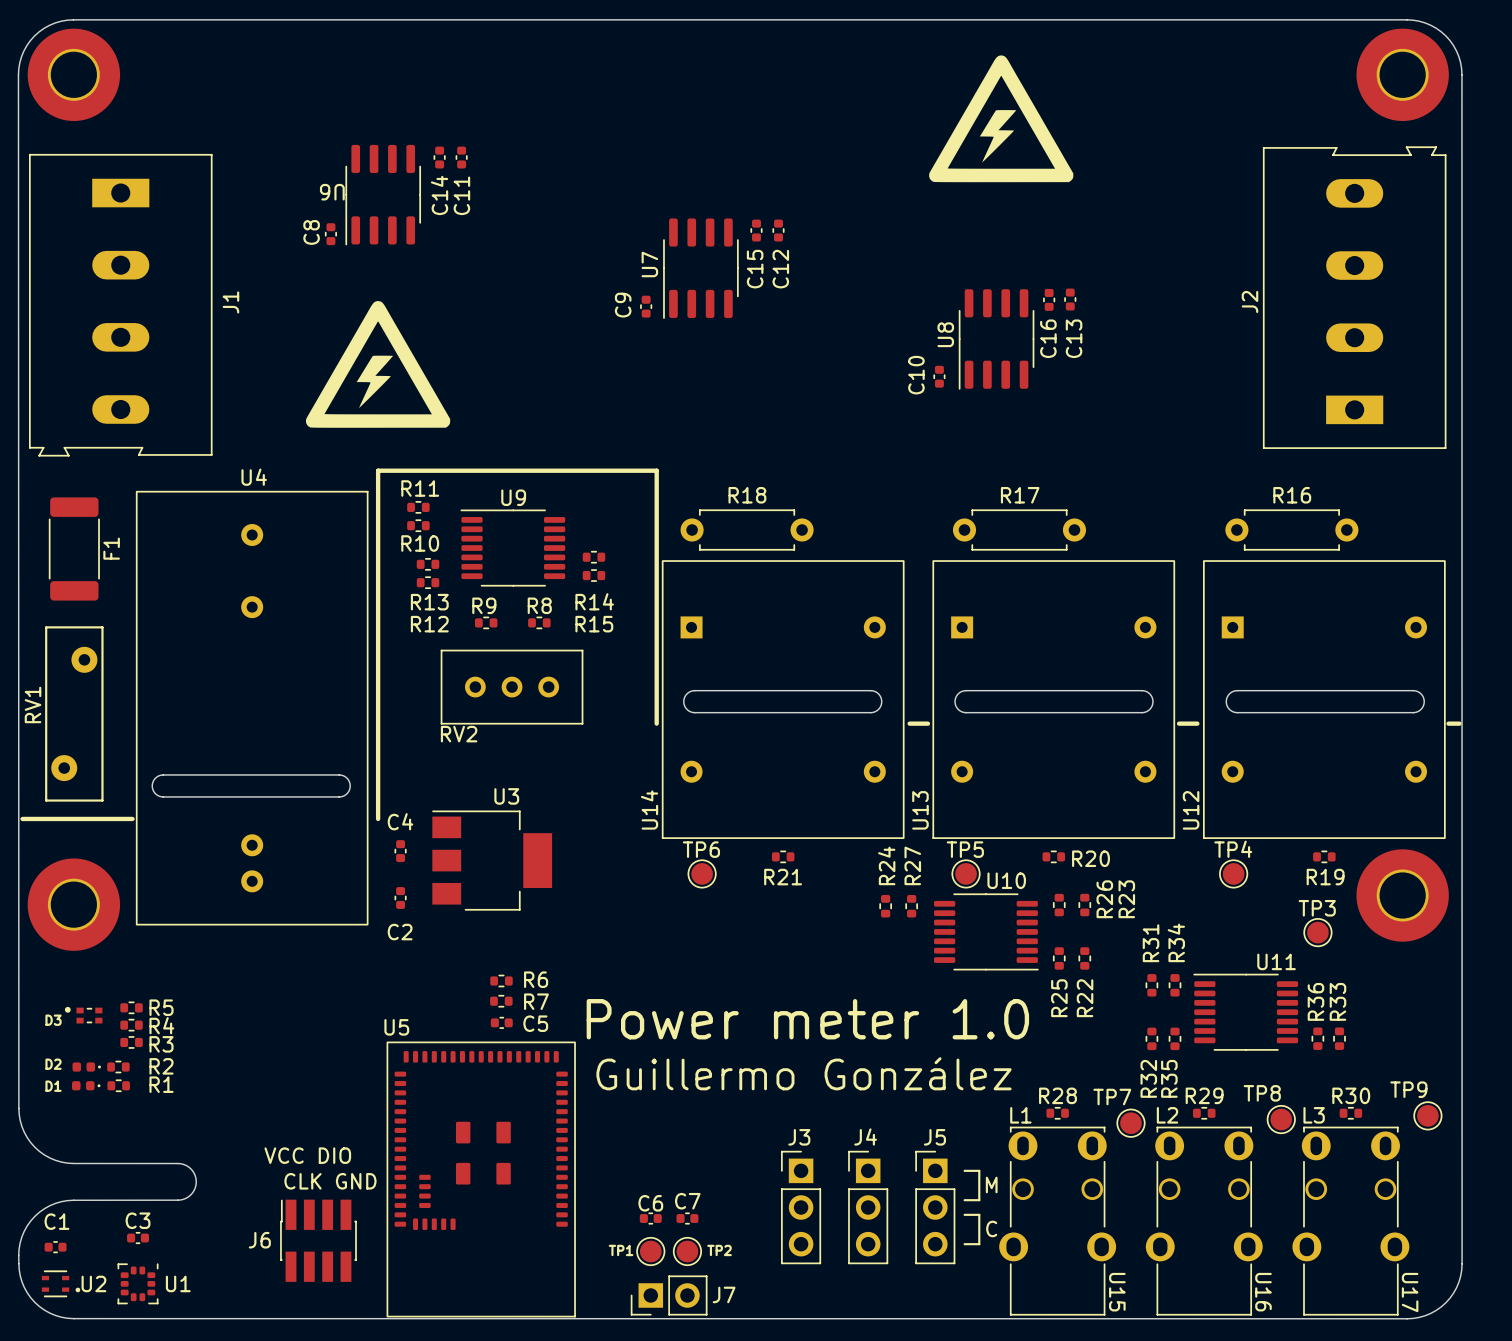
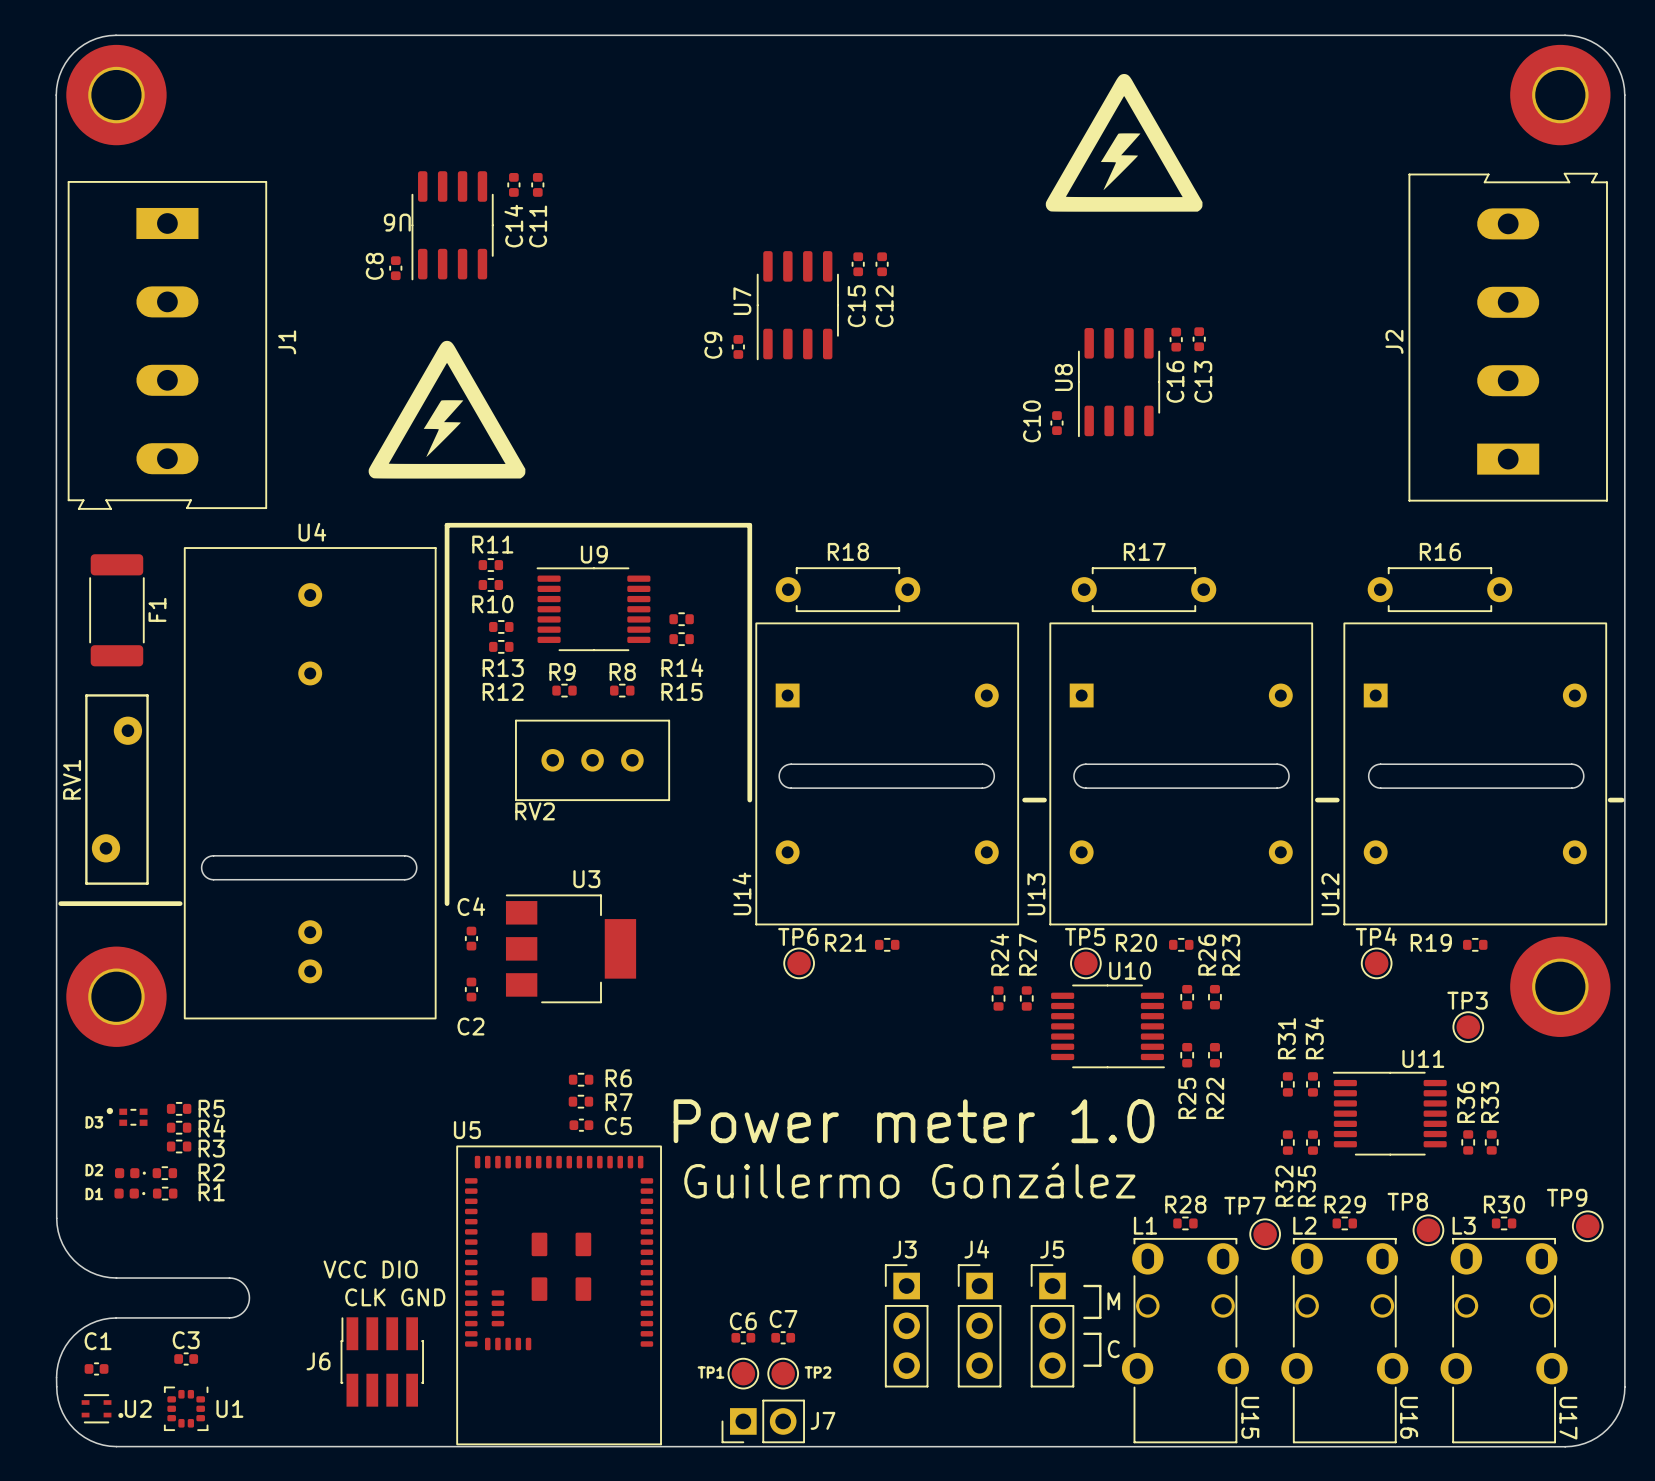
R20 name position: R20 (1091, 858) -> R20 (1136, 942)
R21 name position: R21 (783, 877) -> R21 (845, 942)
R19 name position: R19 (1325, 877) -> R19 (1431, 942)
R26 name position: R26 (1104, 899) -> R26 (1207, 955)
R23 name position: R23 (1126, 899) -> R23 (1231, 955)

